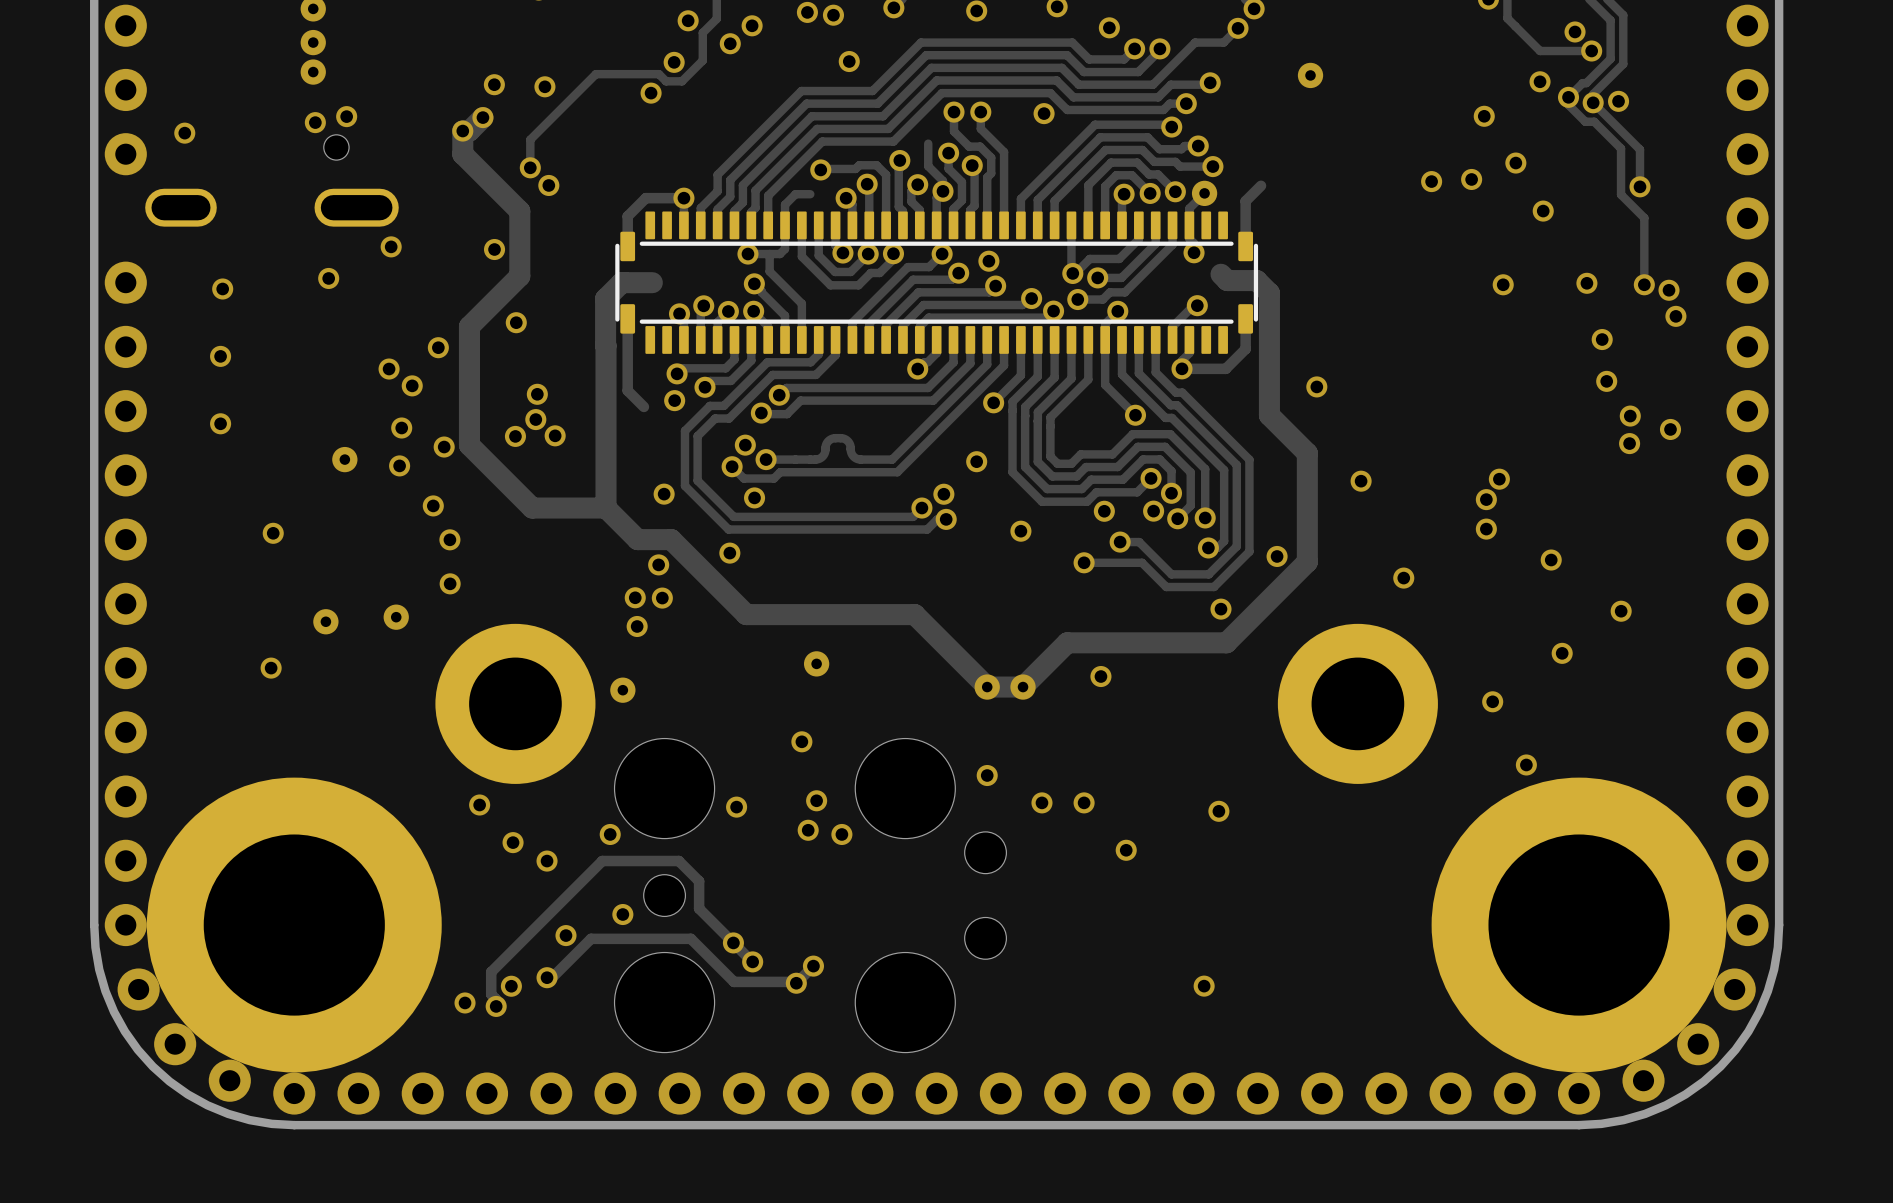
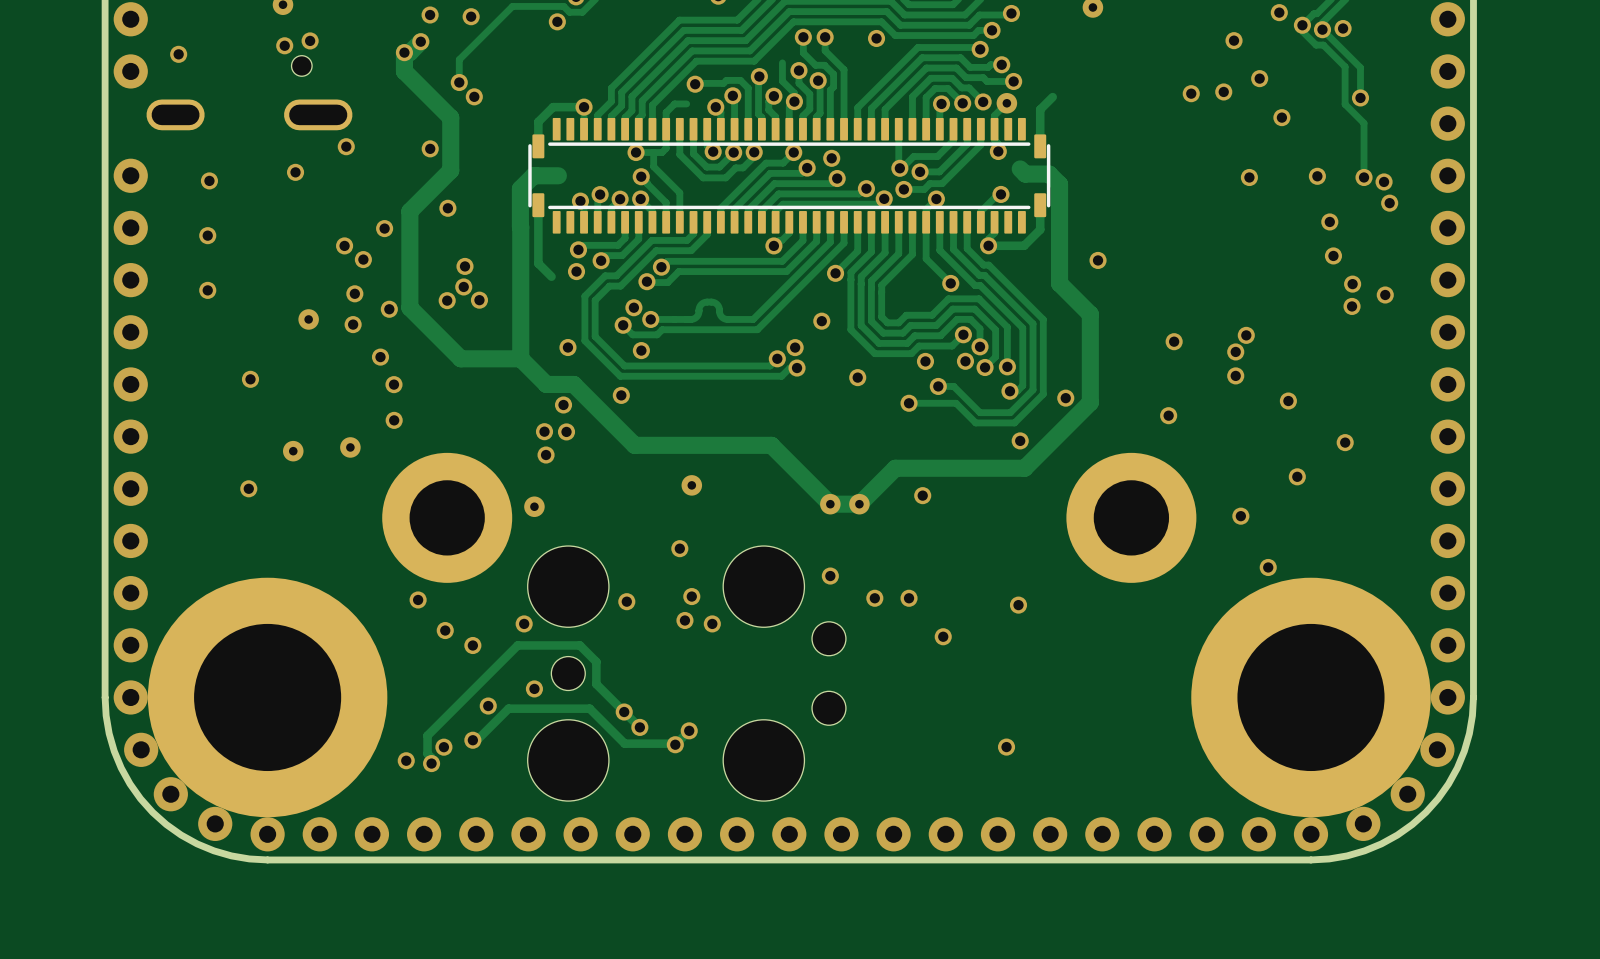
via position: (1361, 481) -> (1174, 341)

